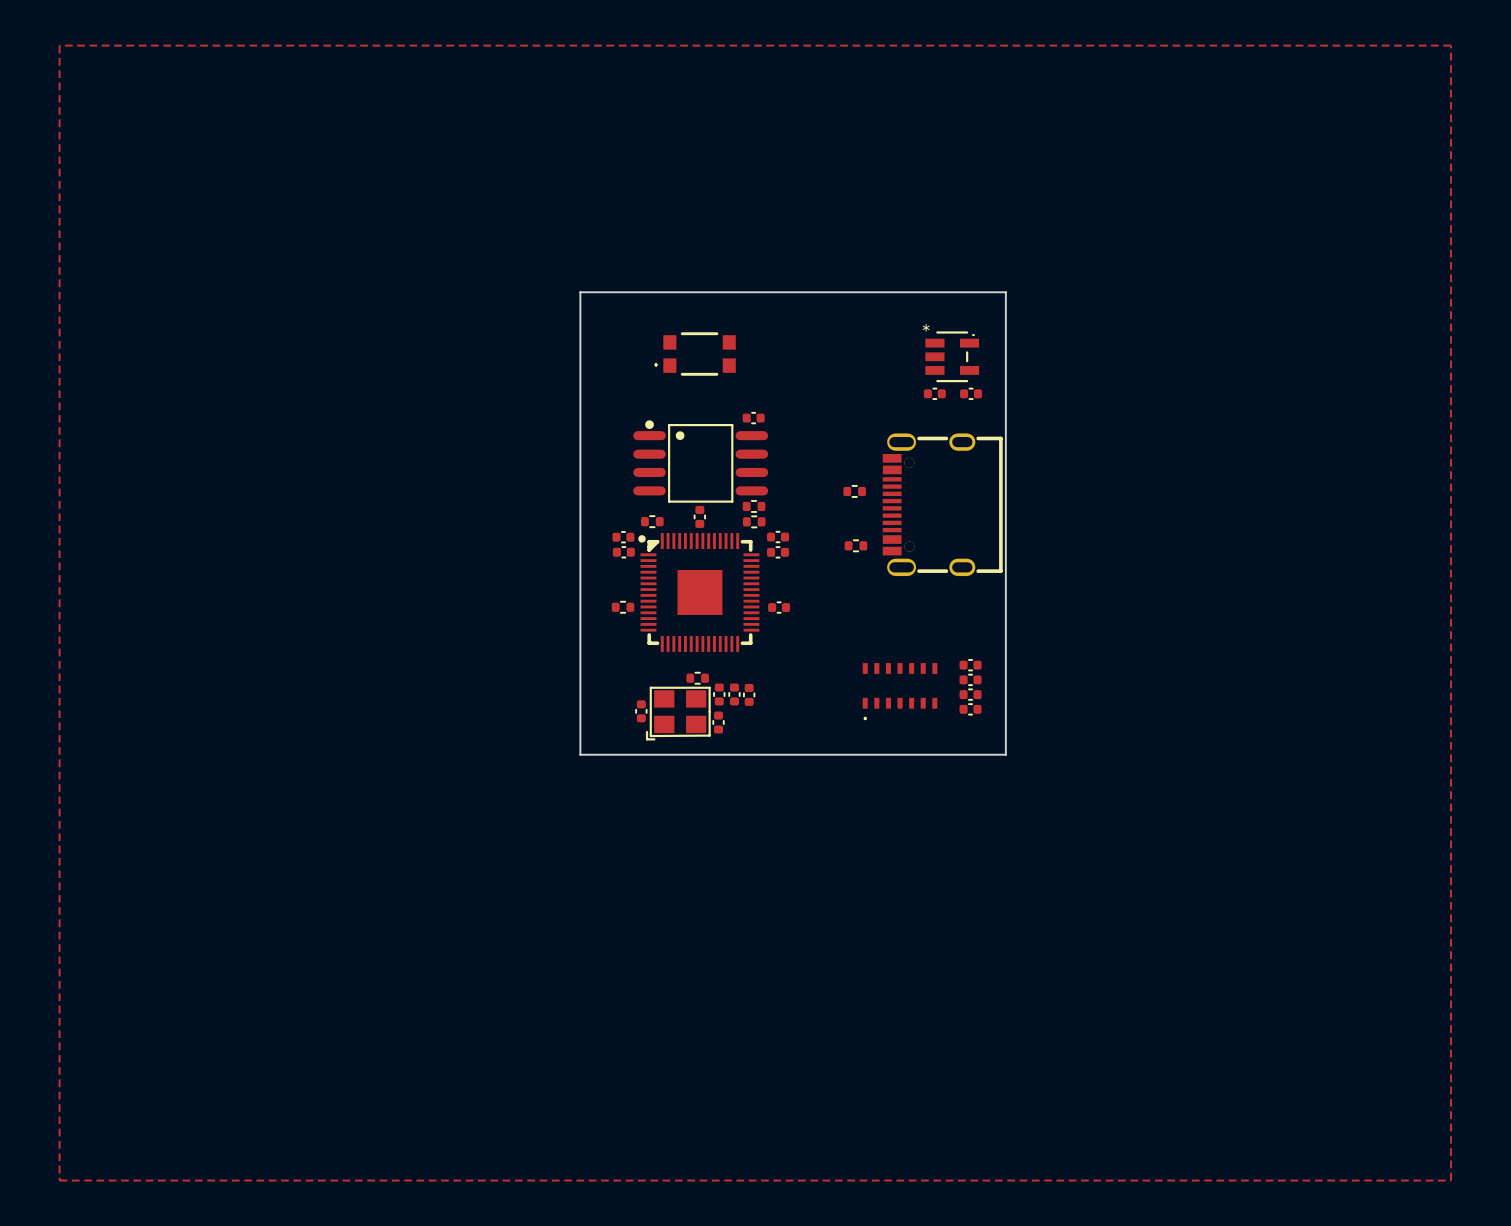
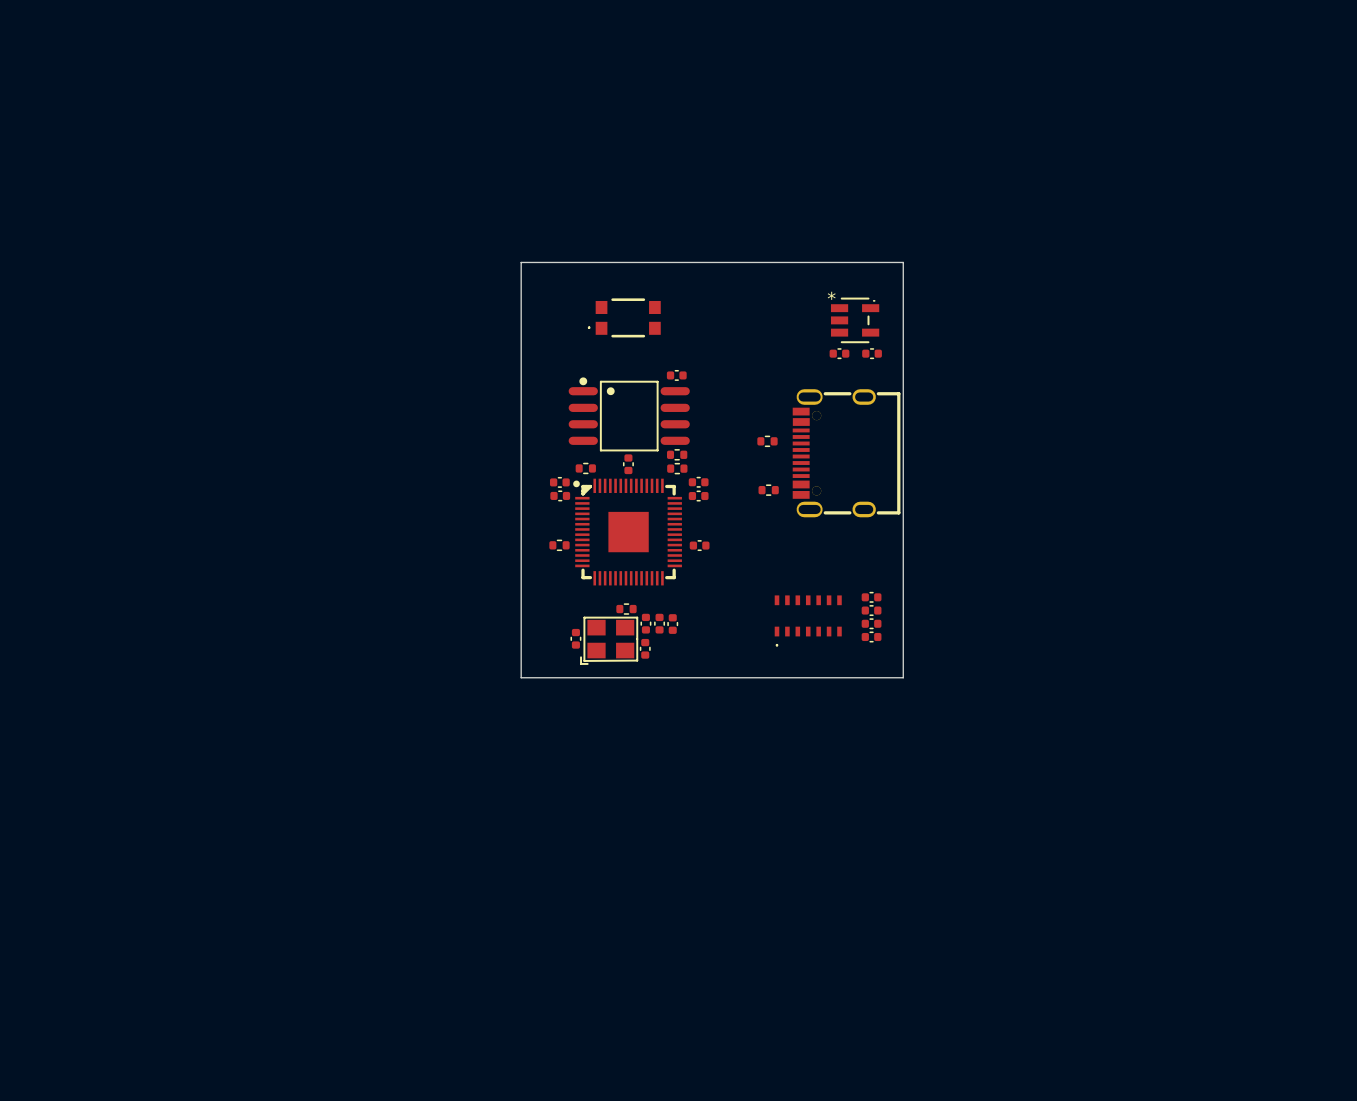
zone outline: (59, 45) (59, 1180) (1451, 1180) (1451, 45) (59, 45) -> none

